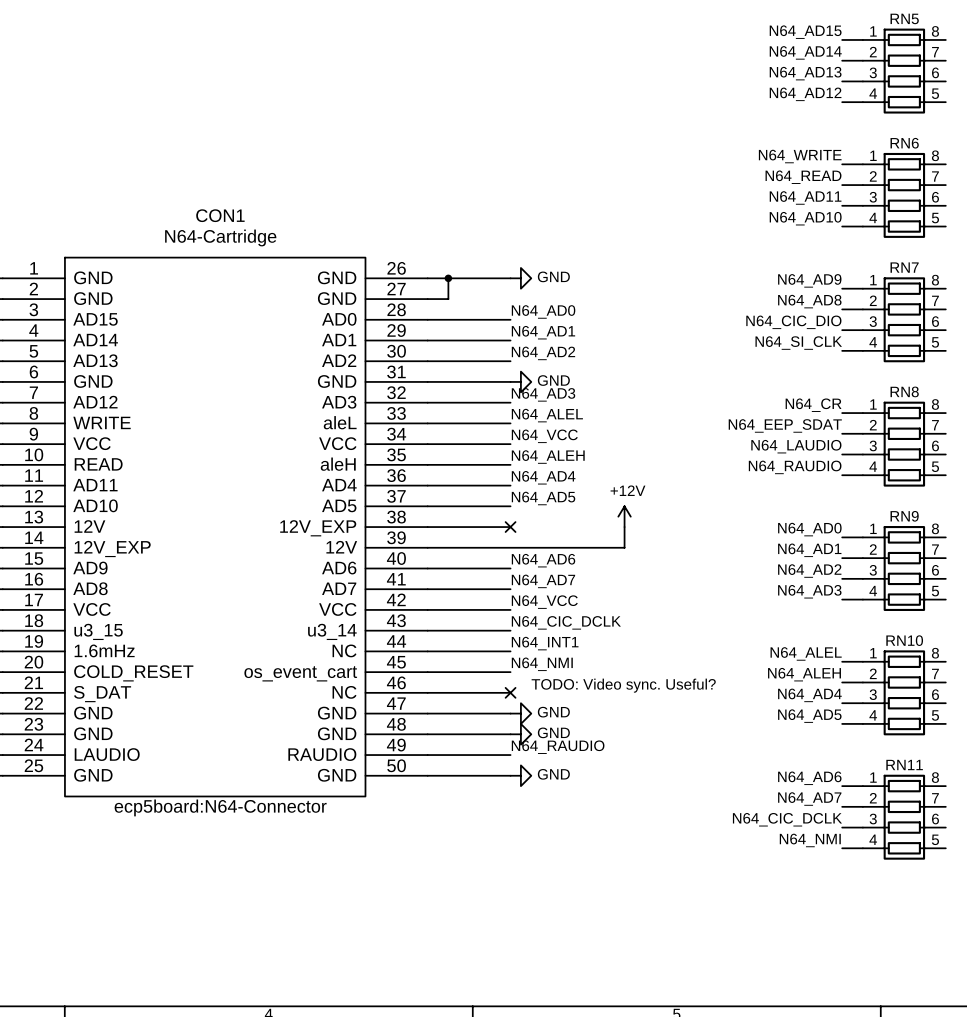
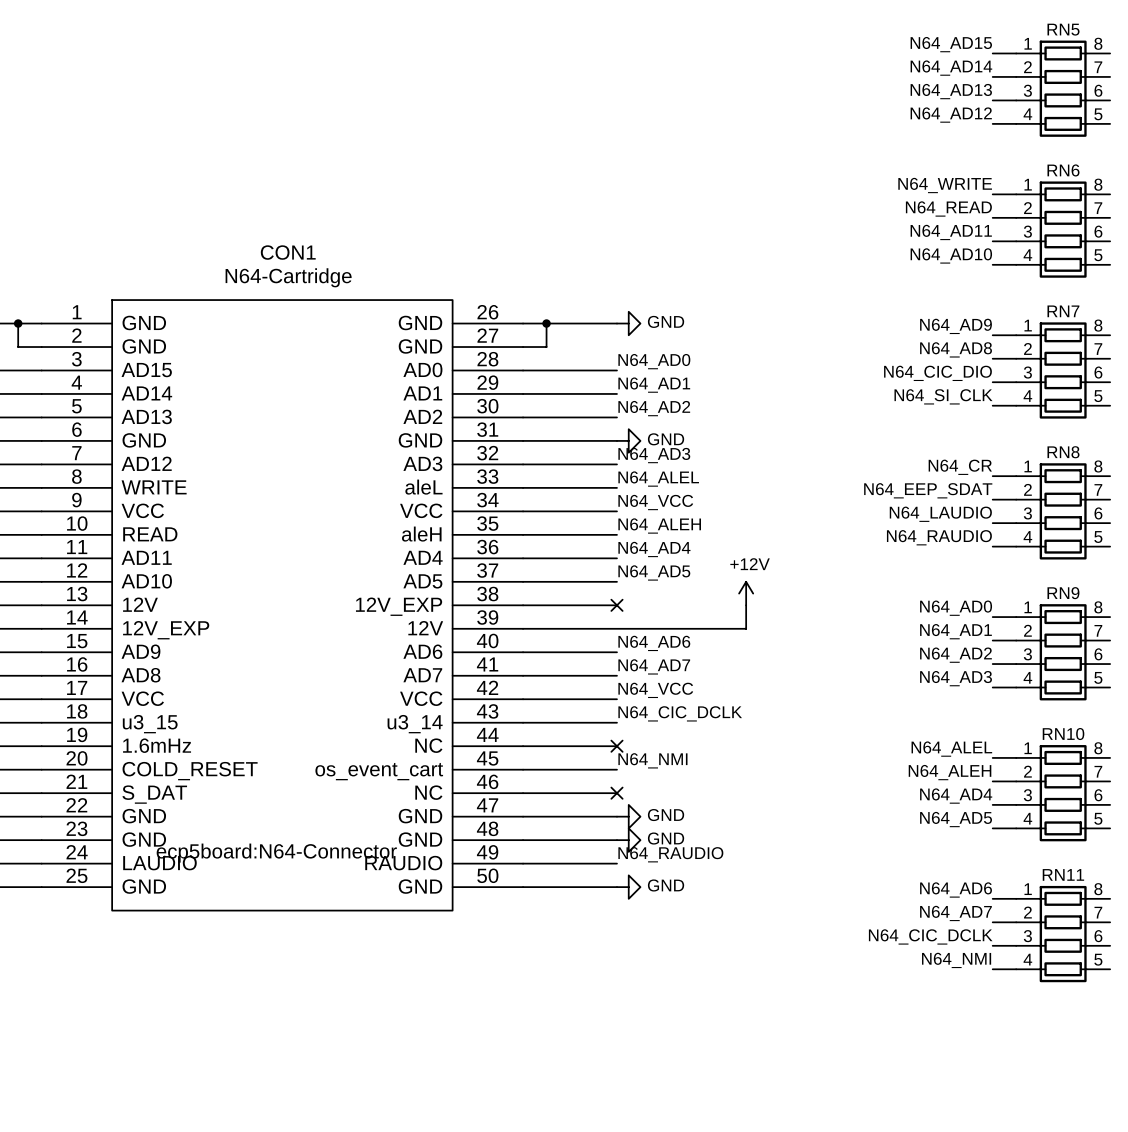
label: N64_INT1 (545, 643) -> none
no-connect mark: none -> (616, 746)
text: TODO: Video sync. Useful? (623, 685) -> none
CON1 text position: ecp5board:N64-Connector (220, 807) -> ecp5board:N64-Connector (276, 853)

